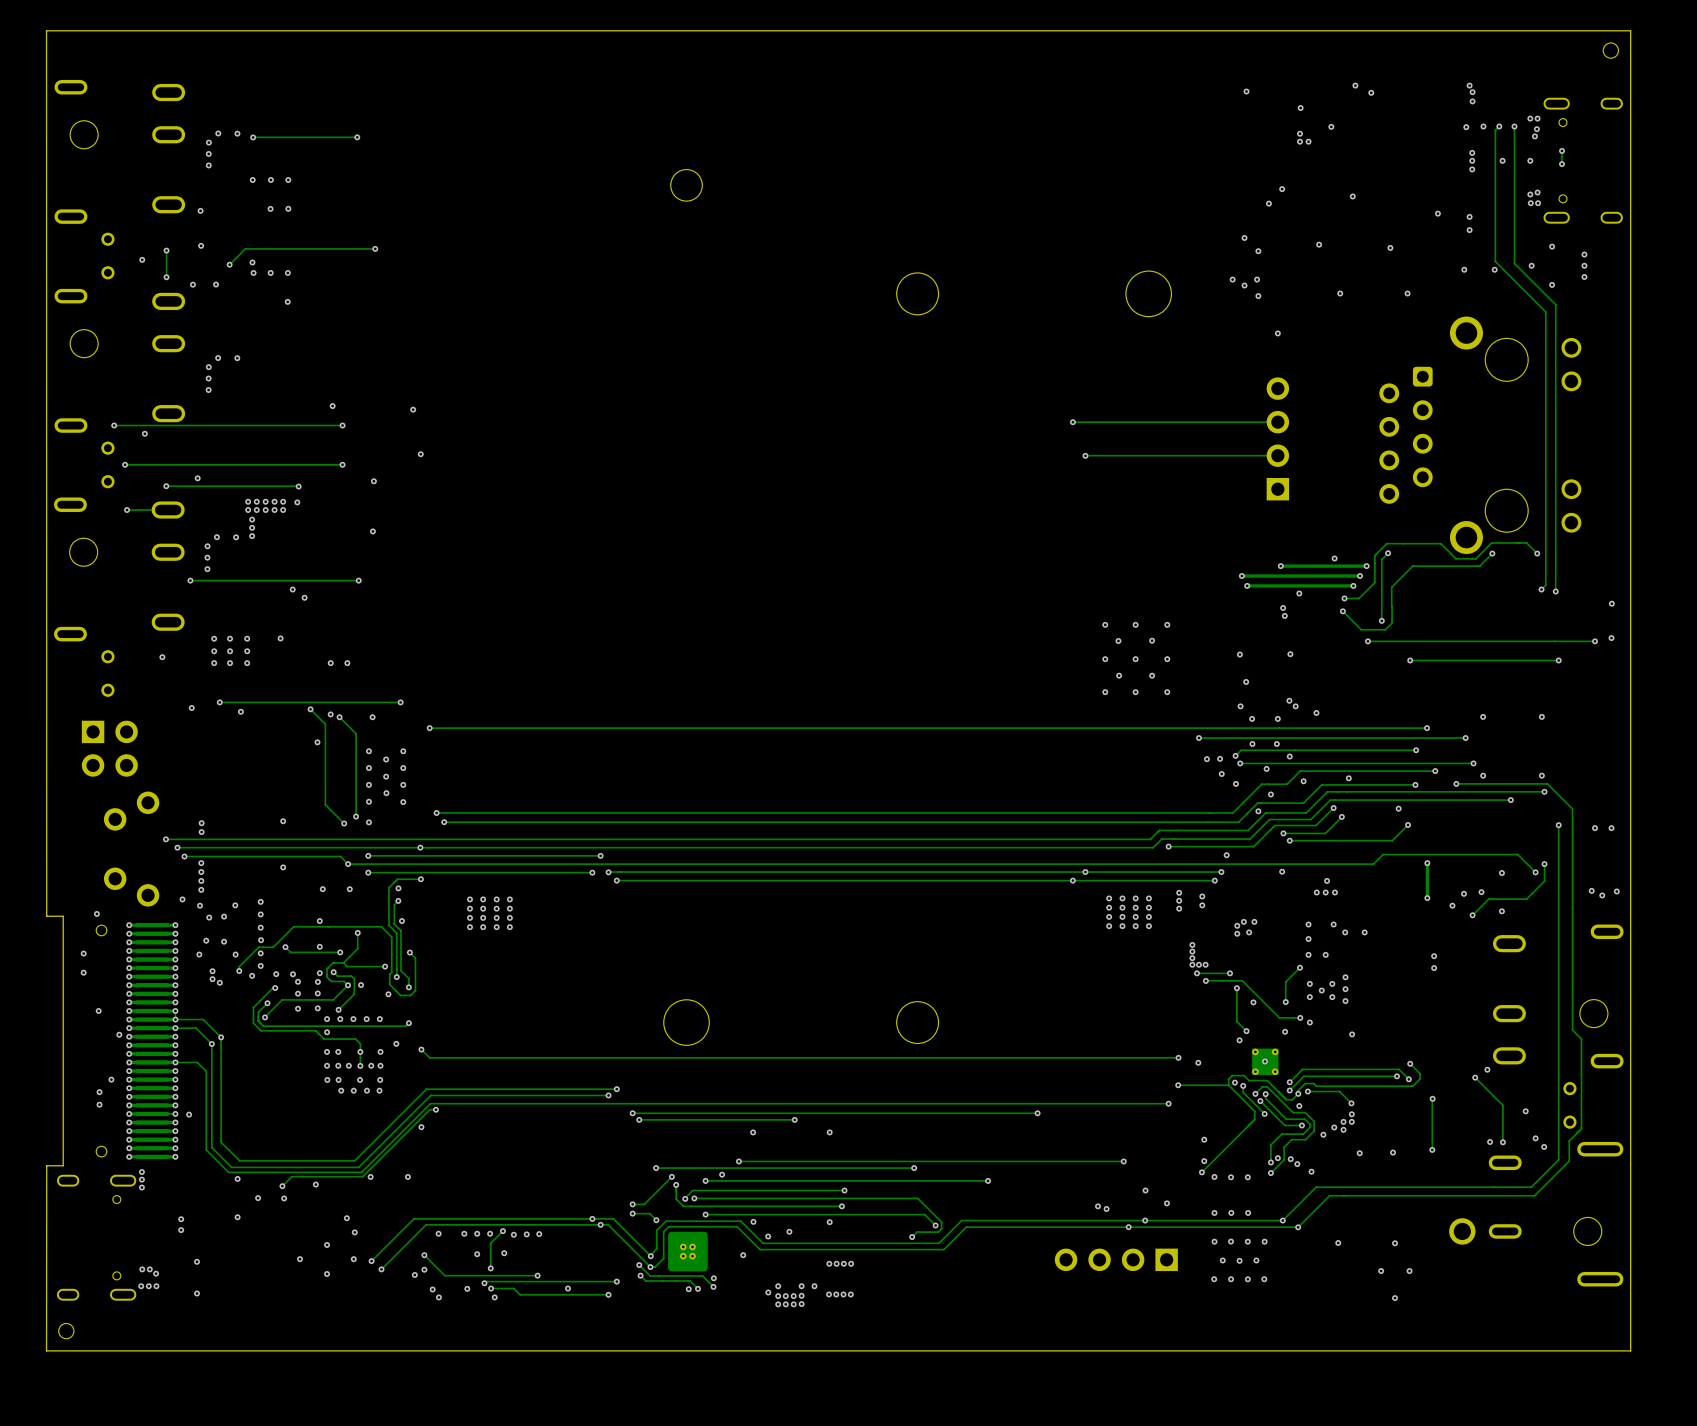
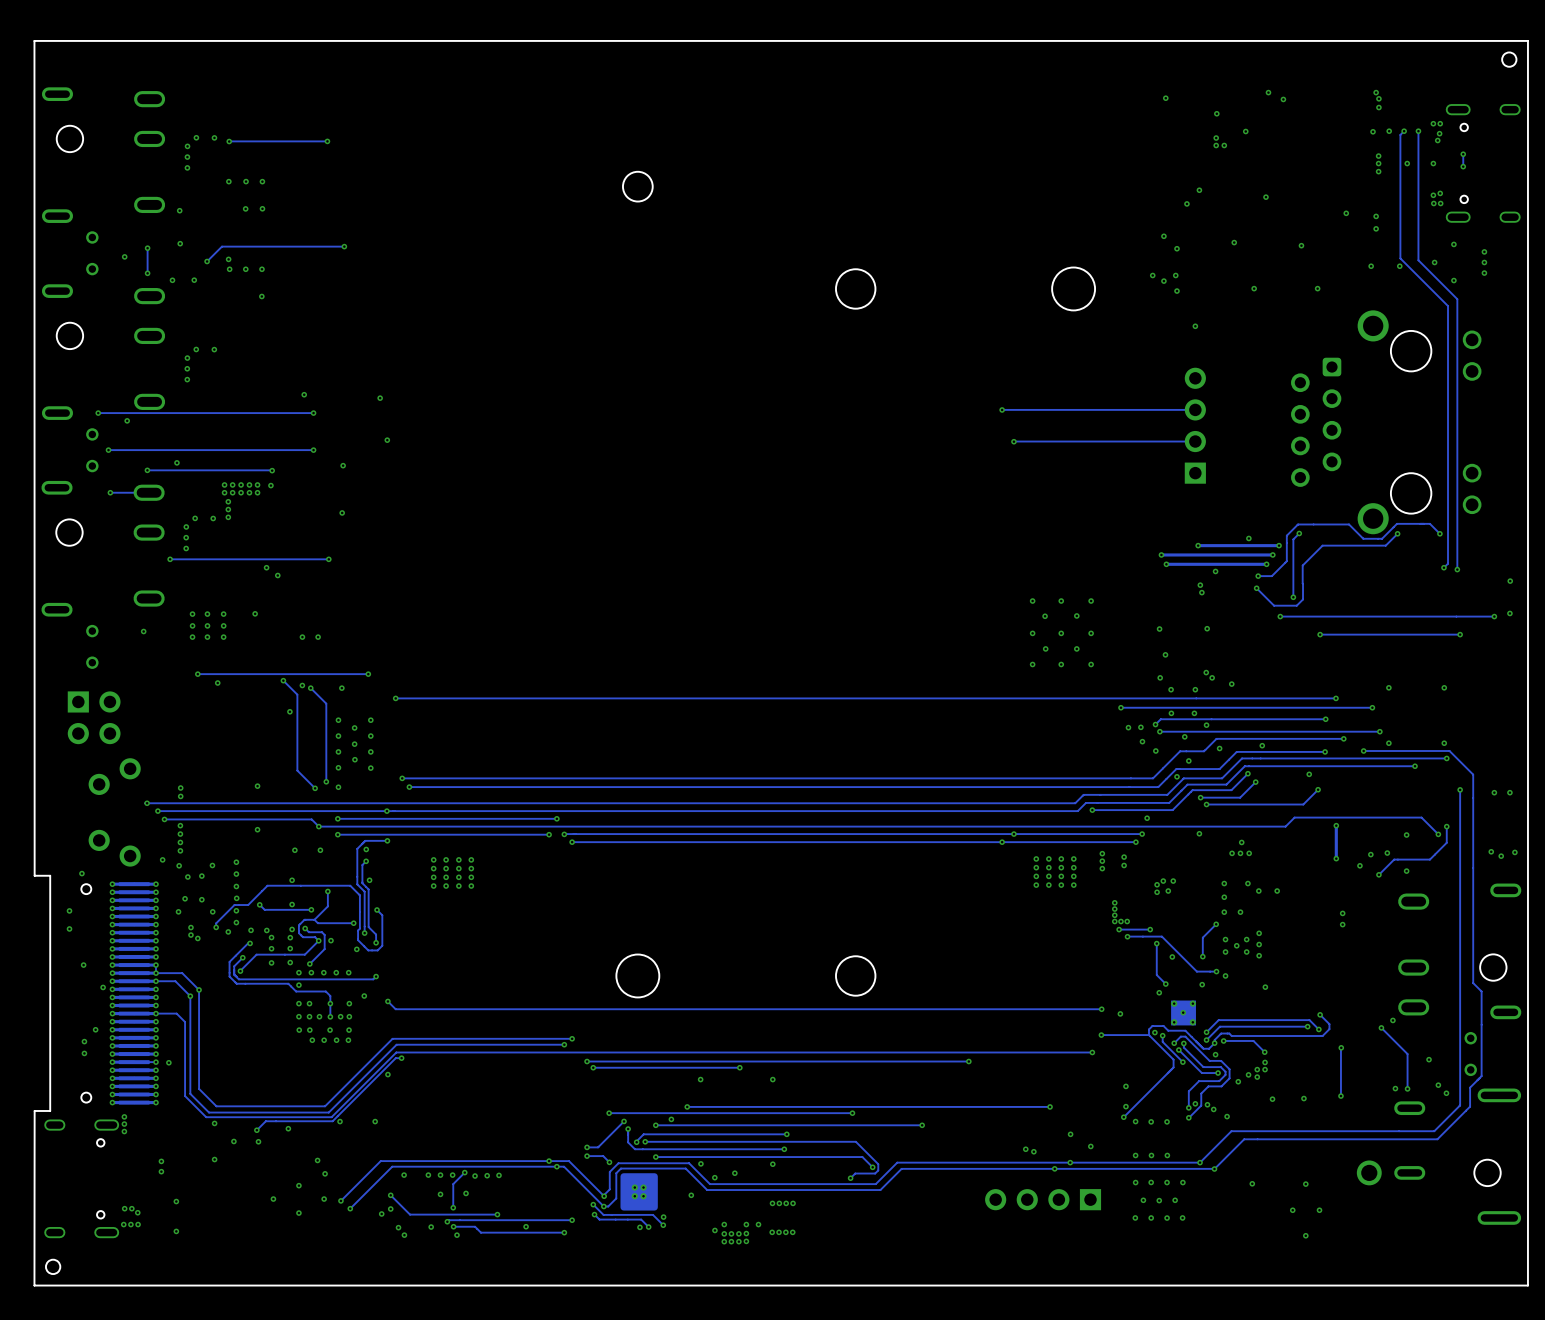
via: (191, 708) -> none

